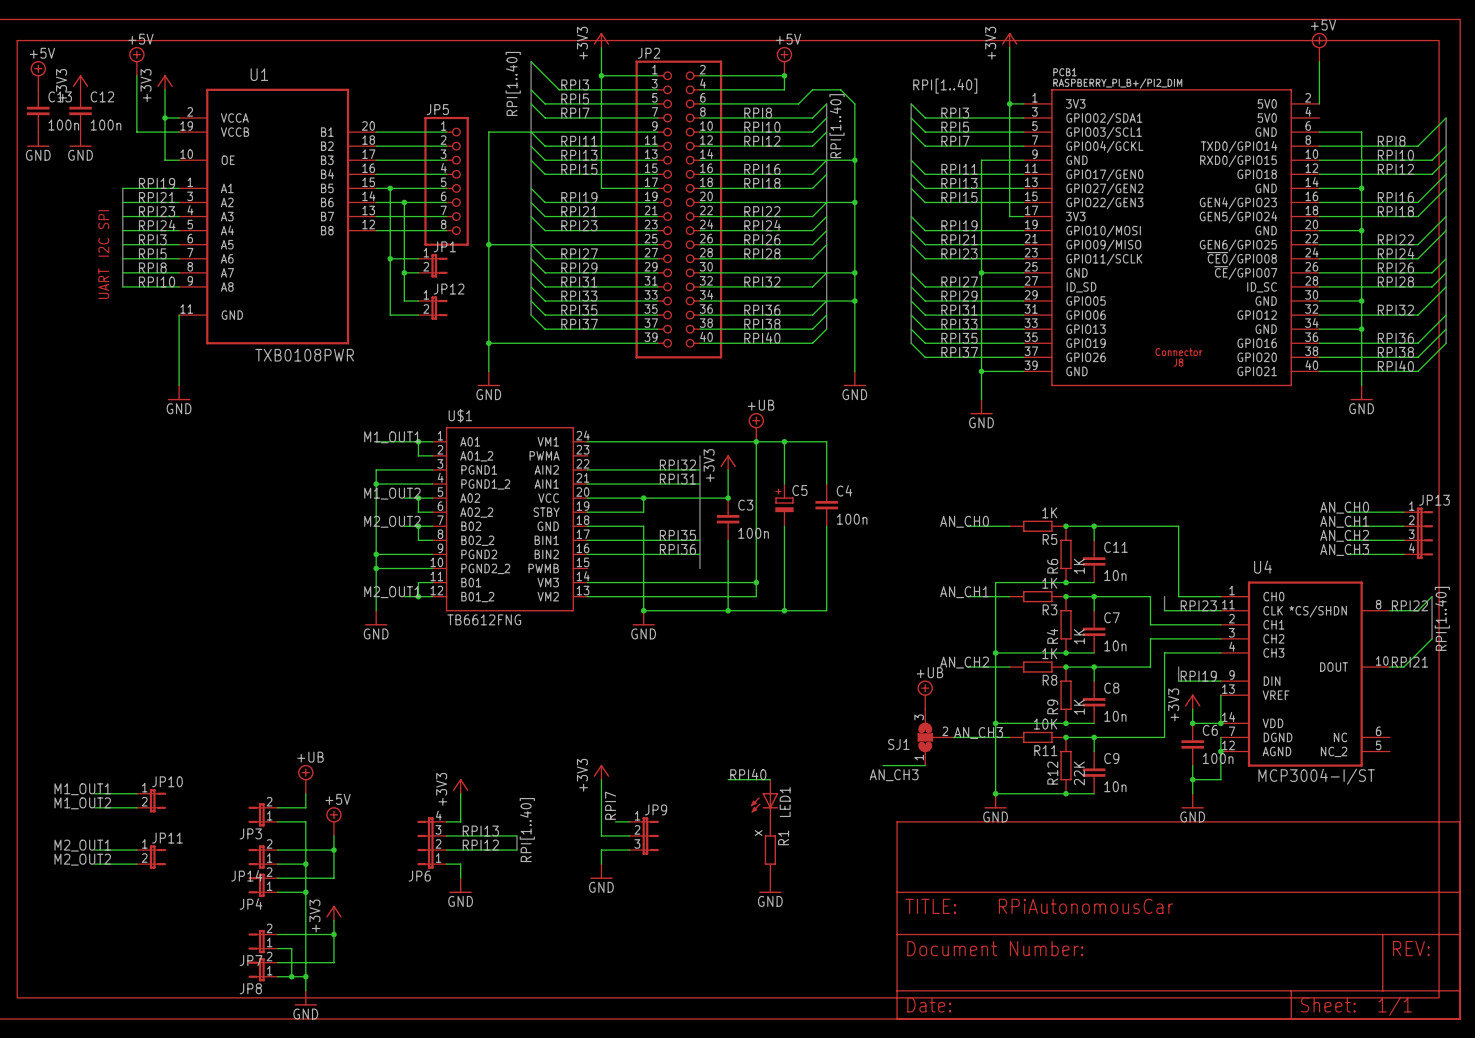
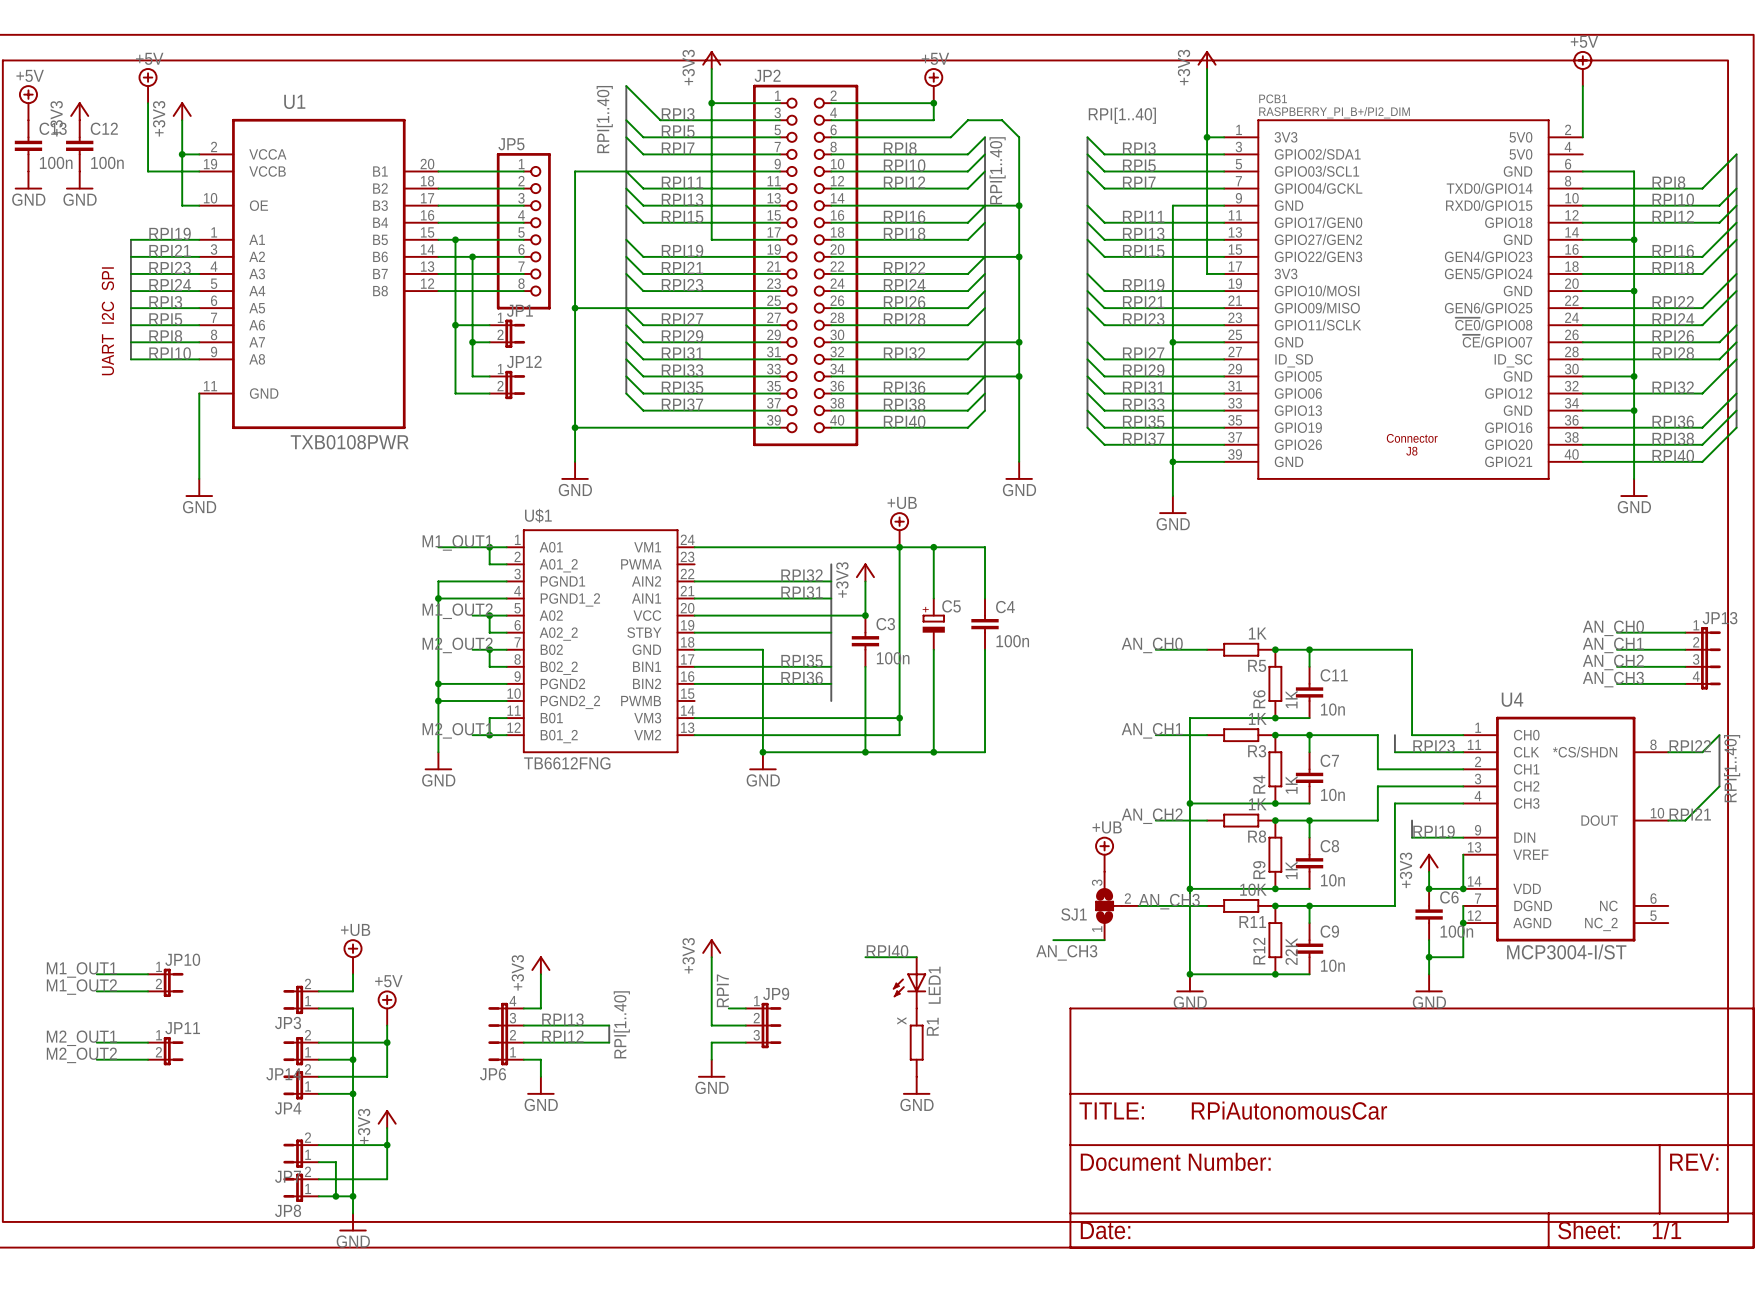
wire: (643, 498) (643, 512) -> (831, 632) (762, 632)
junction: (643, 498) -> none

